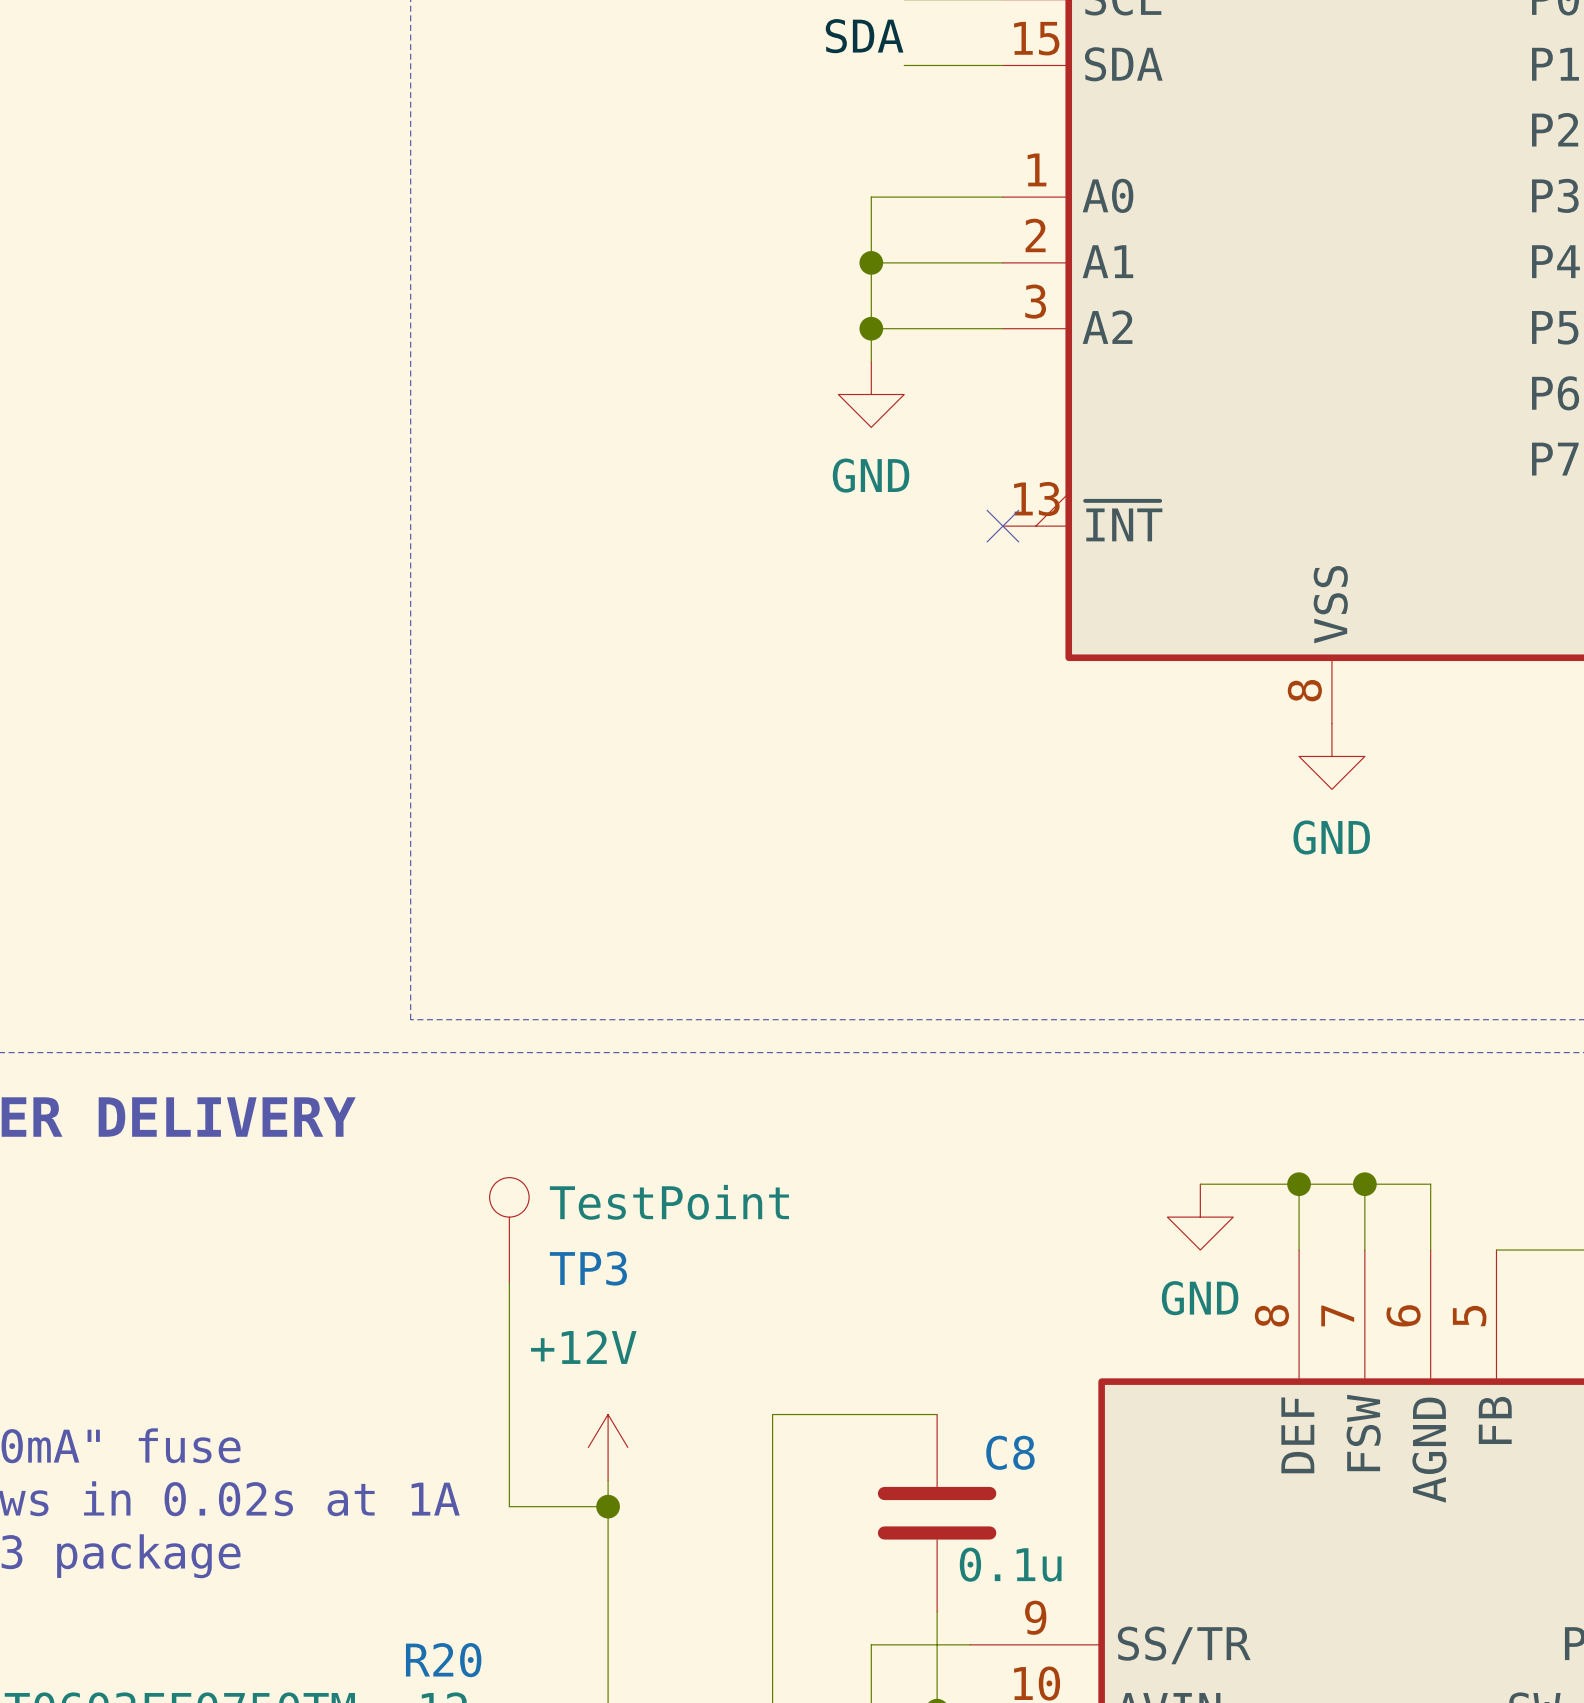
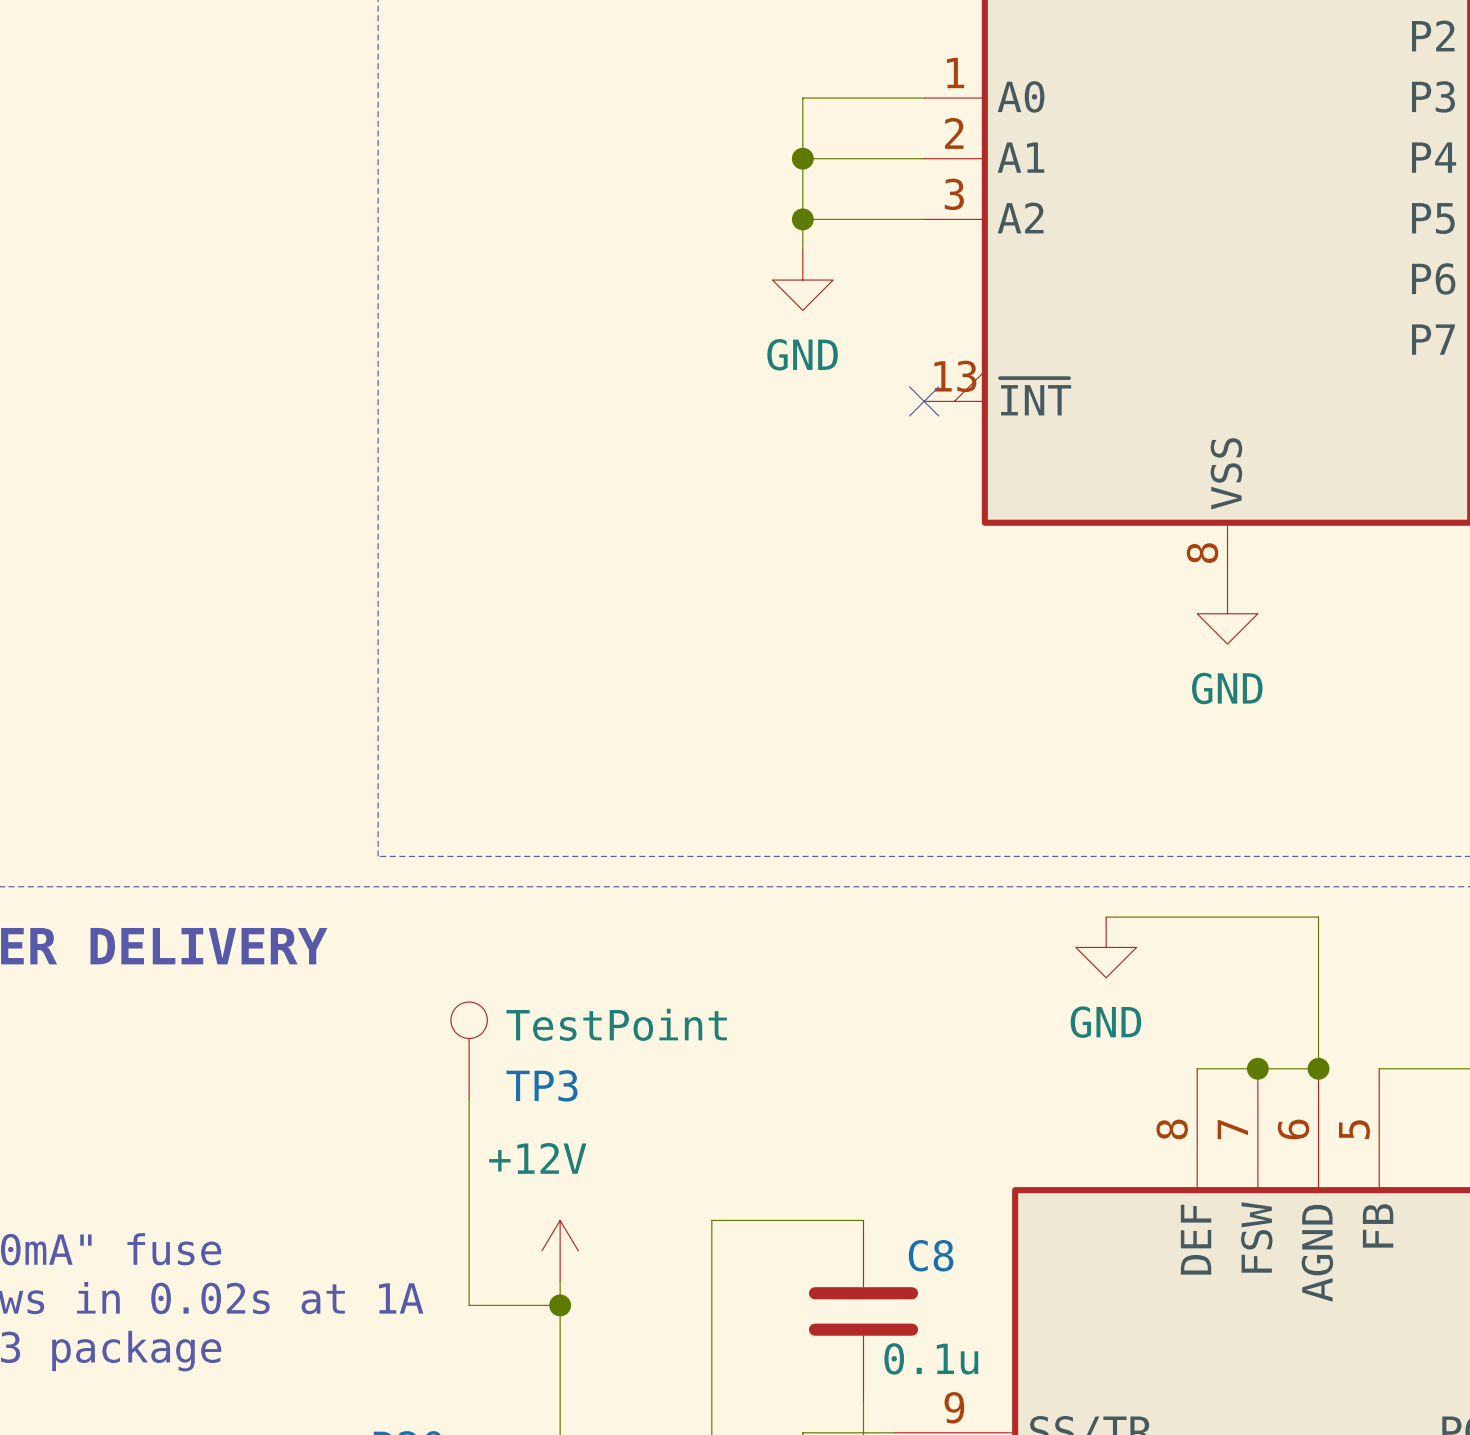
wire: (1200, 1184) (1430, 1184) -> (1106, 917) (1318, 917) (1318, 1008)
wire: (1299, 1184) (1299, 1250) -> (1318, 1068) (1197, 1068)
junction: (1299, 1184) -> none
wire: (1364, 1184) (1364, 1250) -> none
junction: (1364, 1184) -> none
power symbol position: GND (1200, 1217) -> GND (1106, 947)
junction: none -> (1257, 1068)
junction: none -> (1318, 1068)

